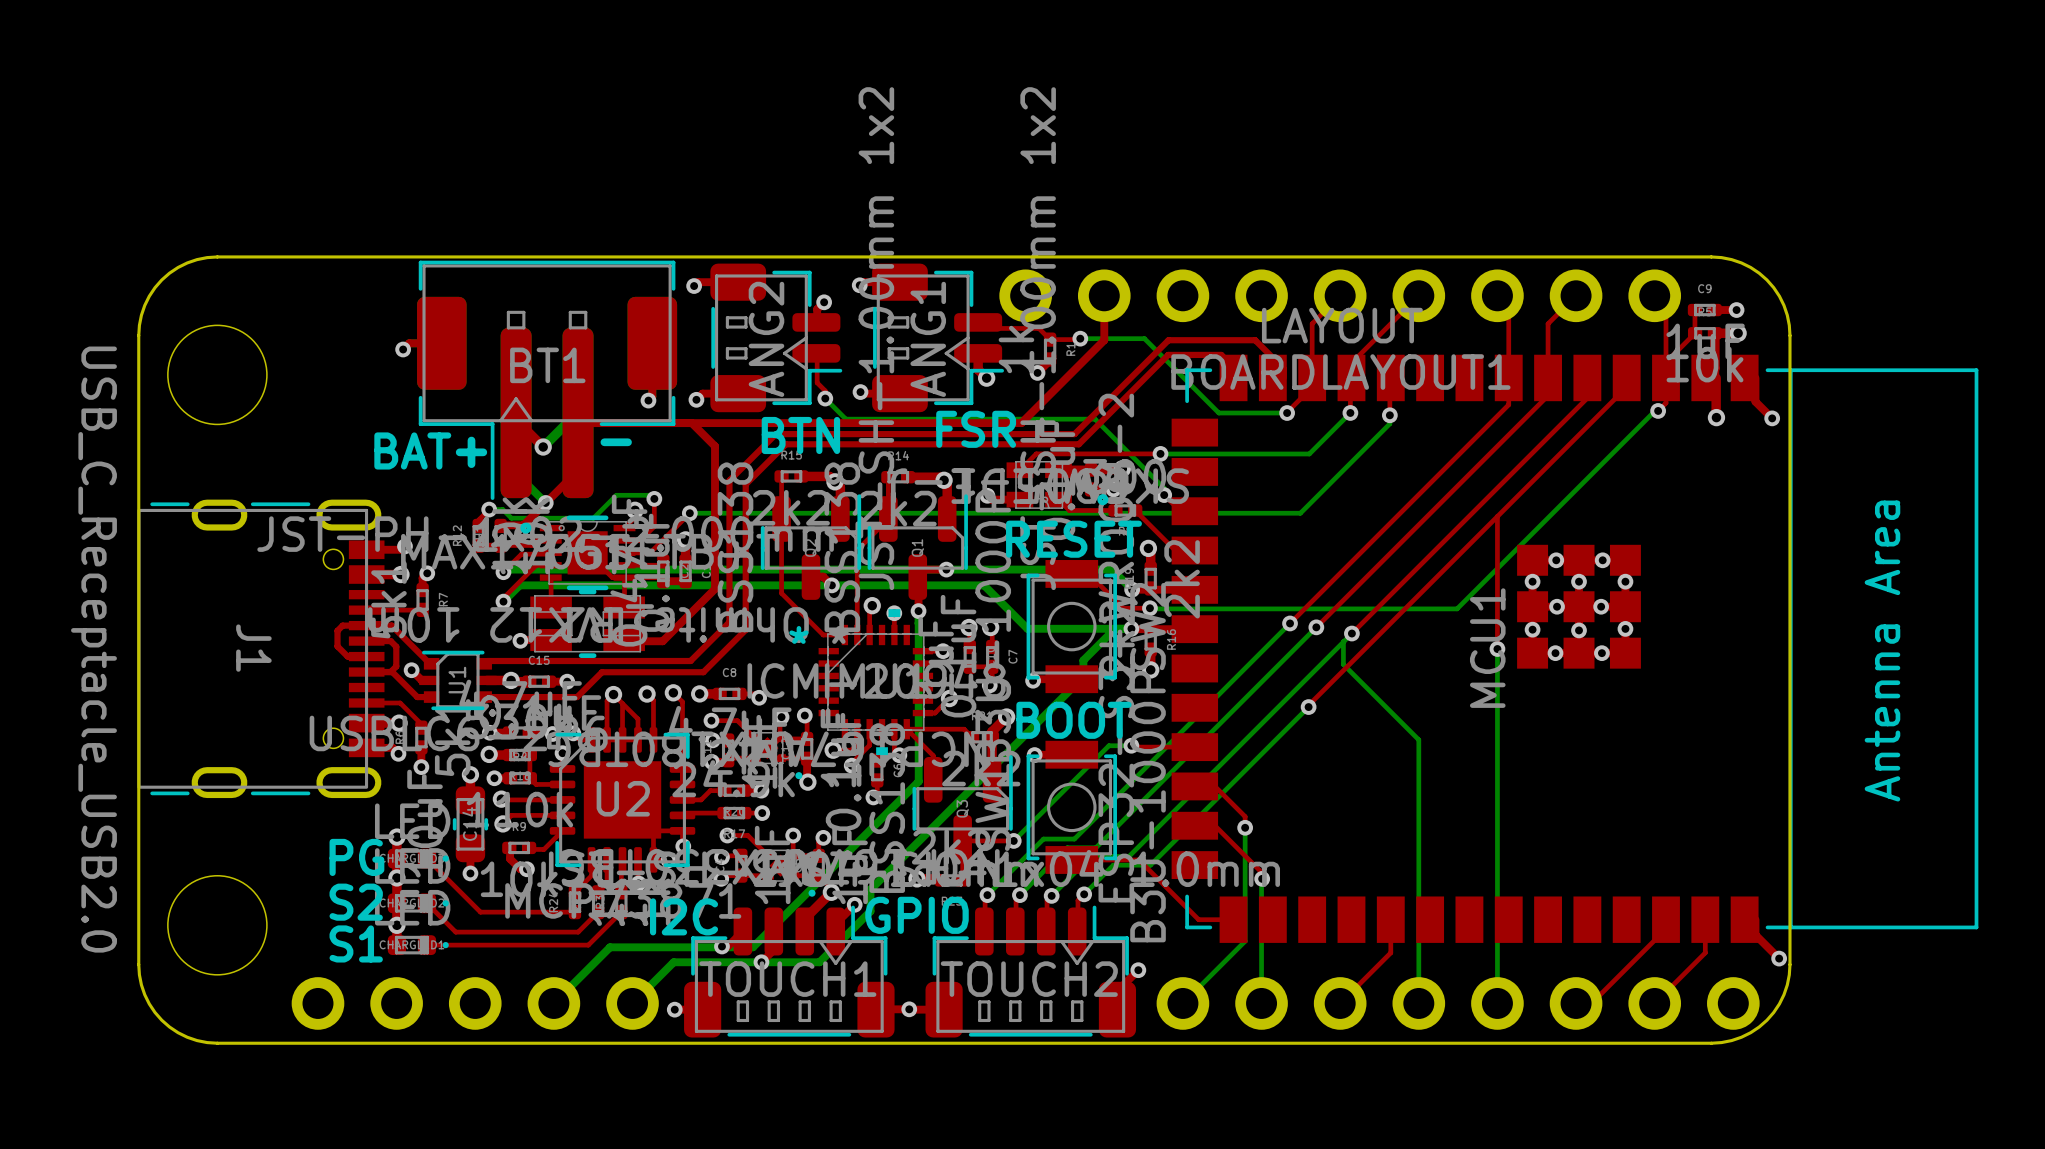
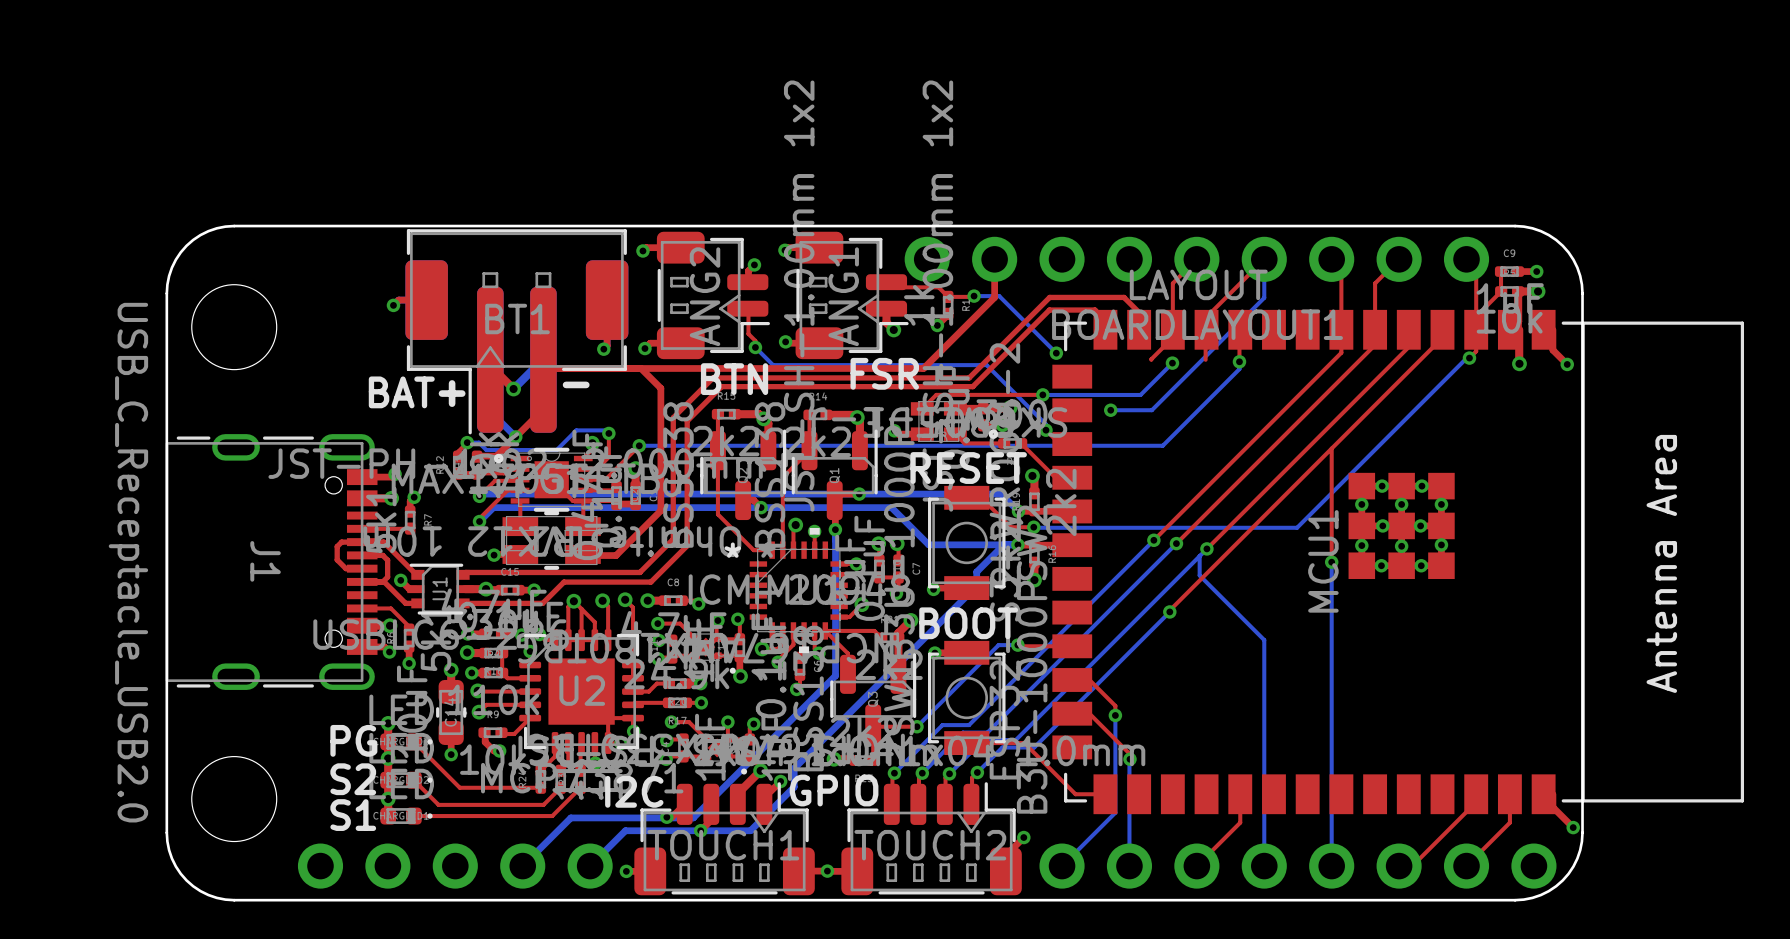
bottom track: none -> (1264, 259) (1264, 297) (1151, 410) (1110, 410)
bottom track: (1109, 338) (1144, 338) (1218, 413) (1287, 413) -> (999, 296) (1056, 353)
via: none -> (1056, 353)
bottom track: (1350, 412) (1309, 453) (1274, 453) -> (1172, 363) (1140, 394)
via: (1350, 412) -> none
via: (1287, 413) -> none
via: none -> (1172, 363)
via: none -> (1110, 410)

